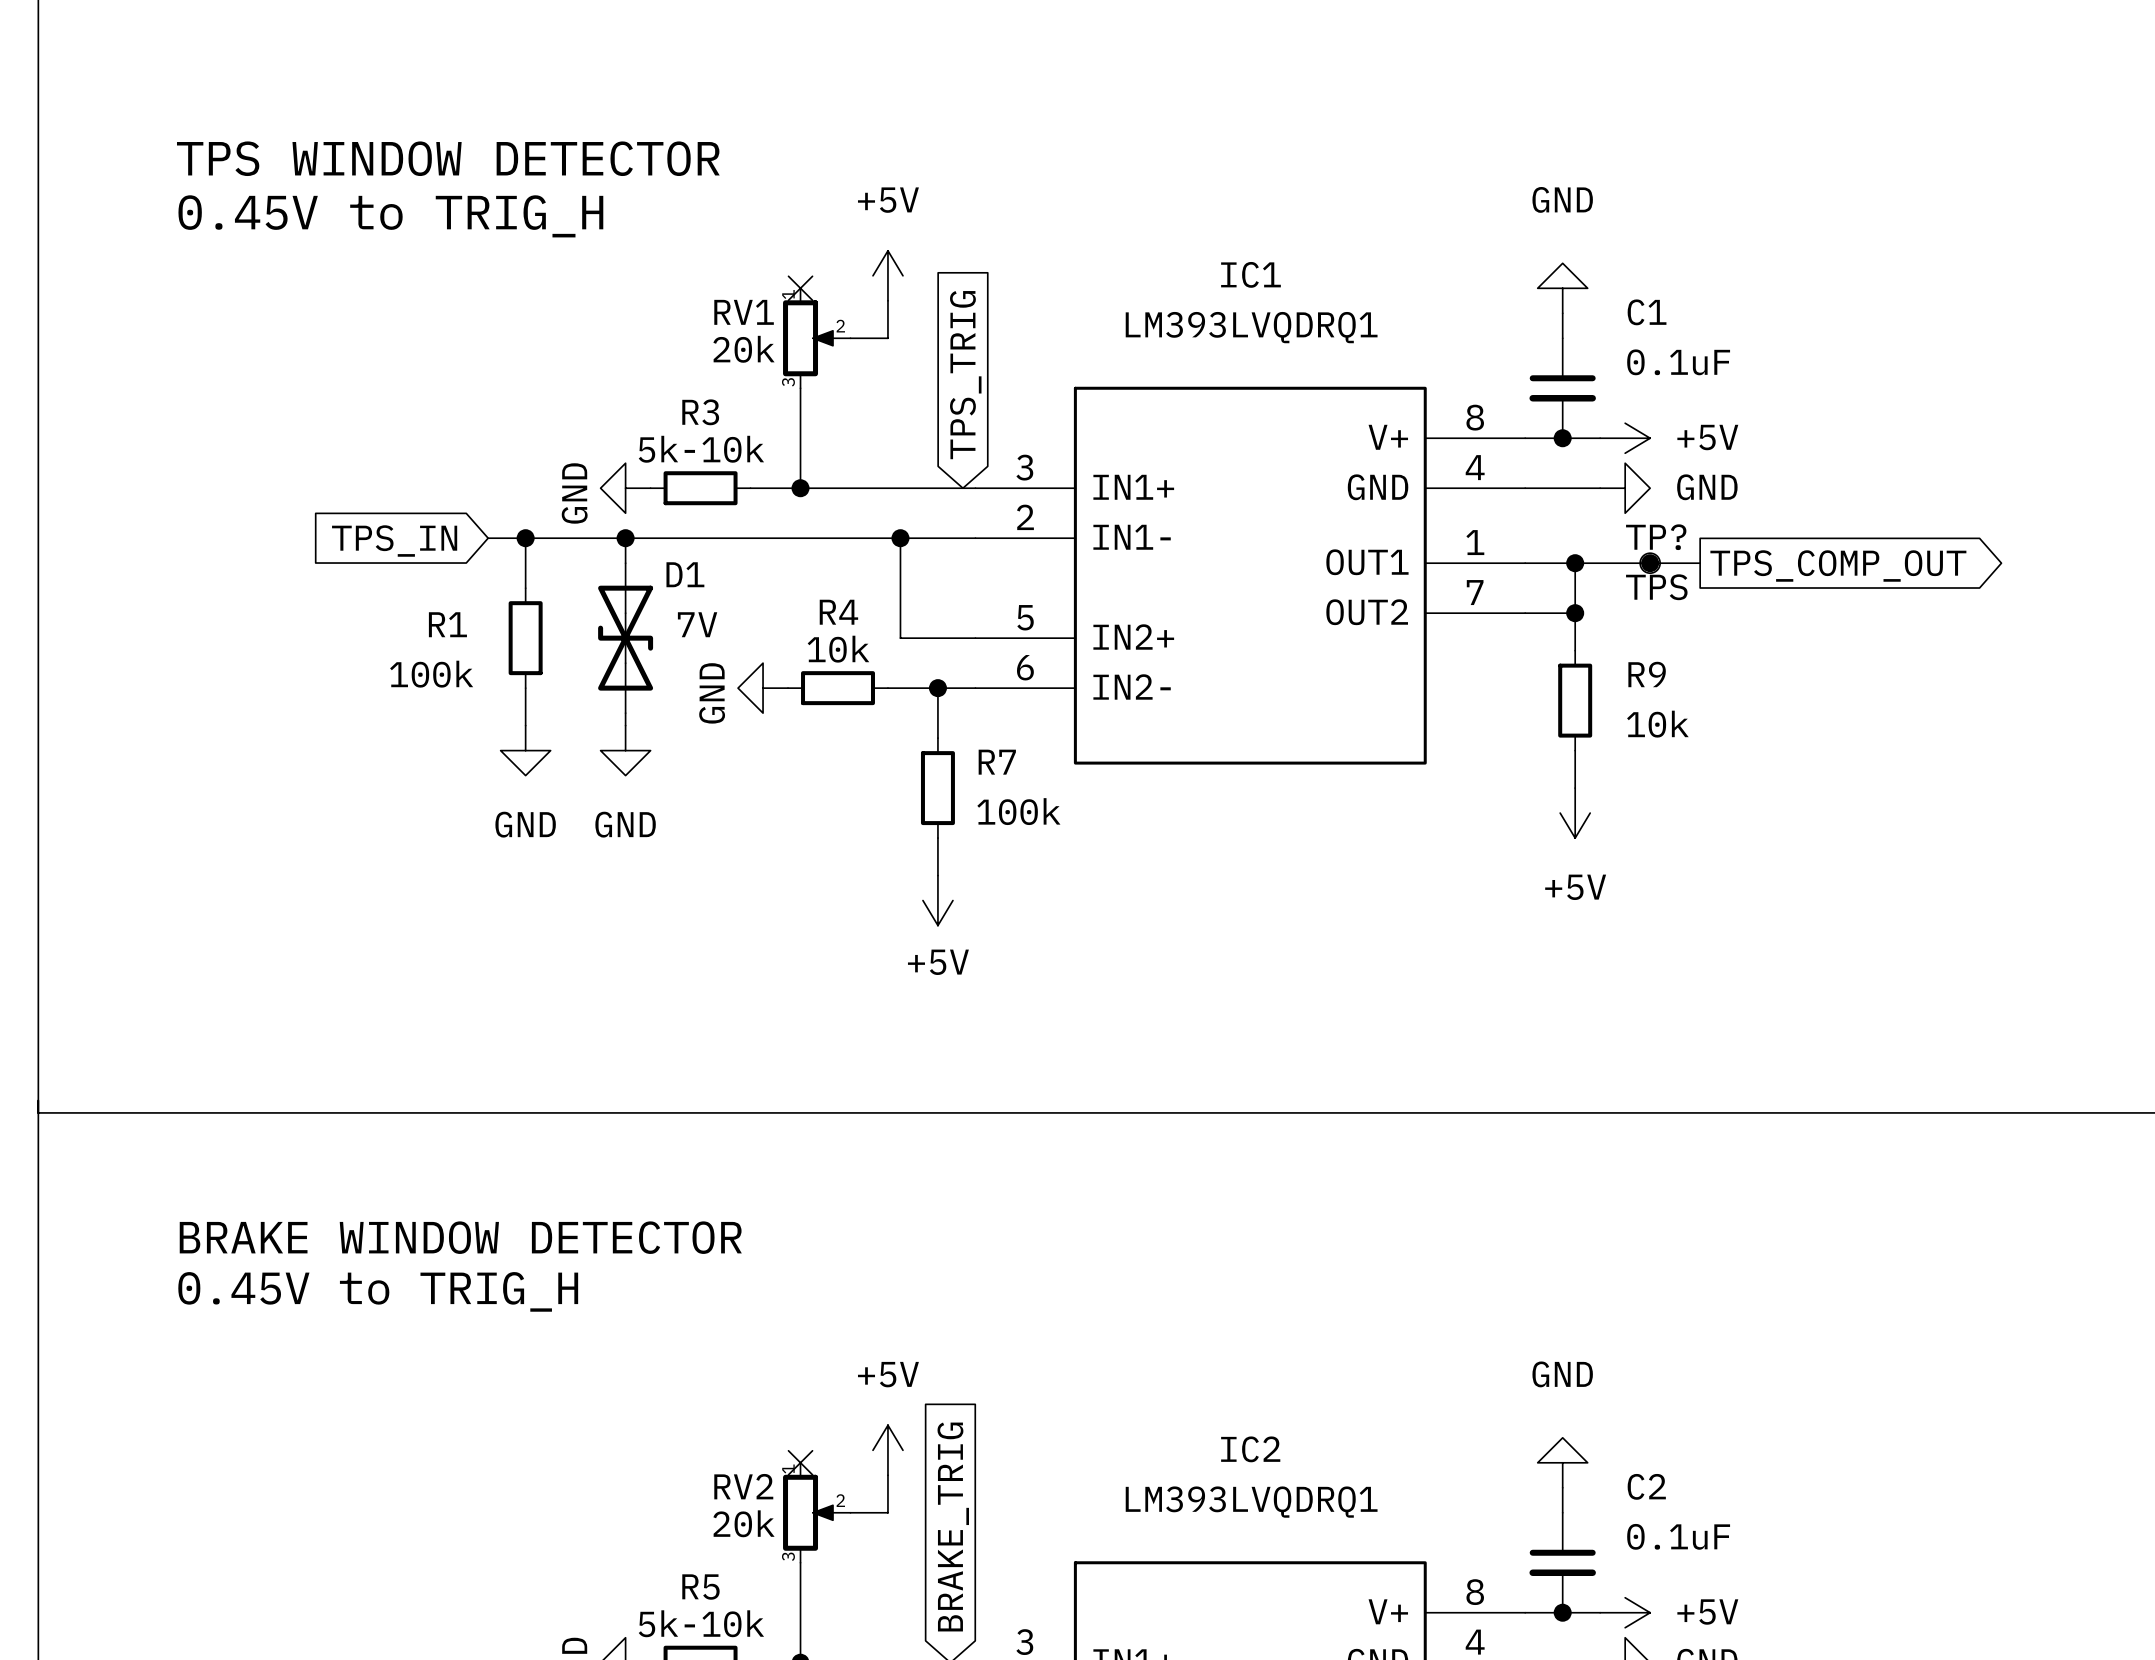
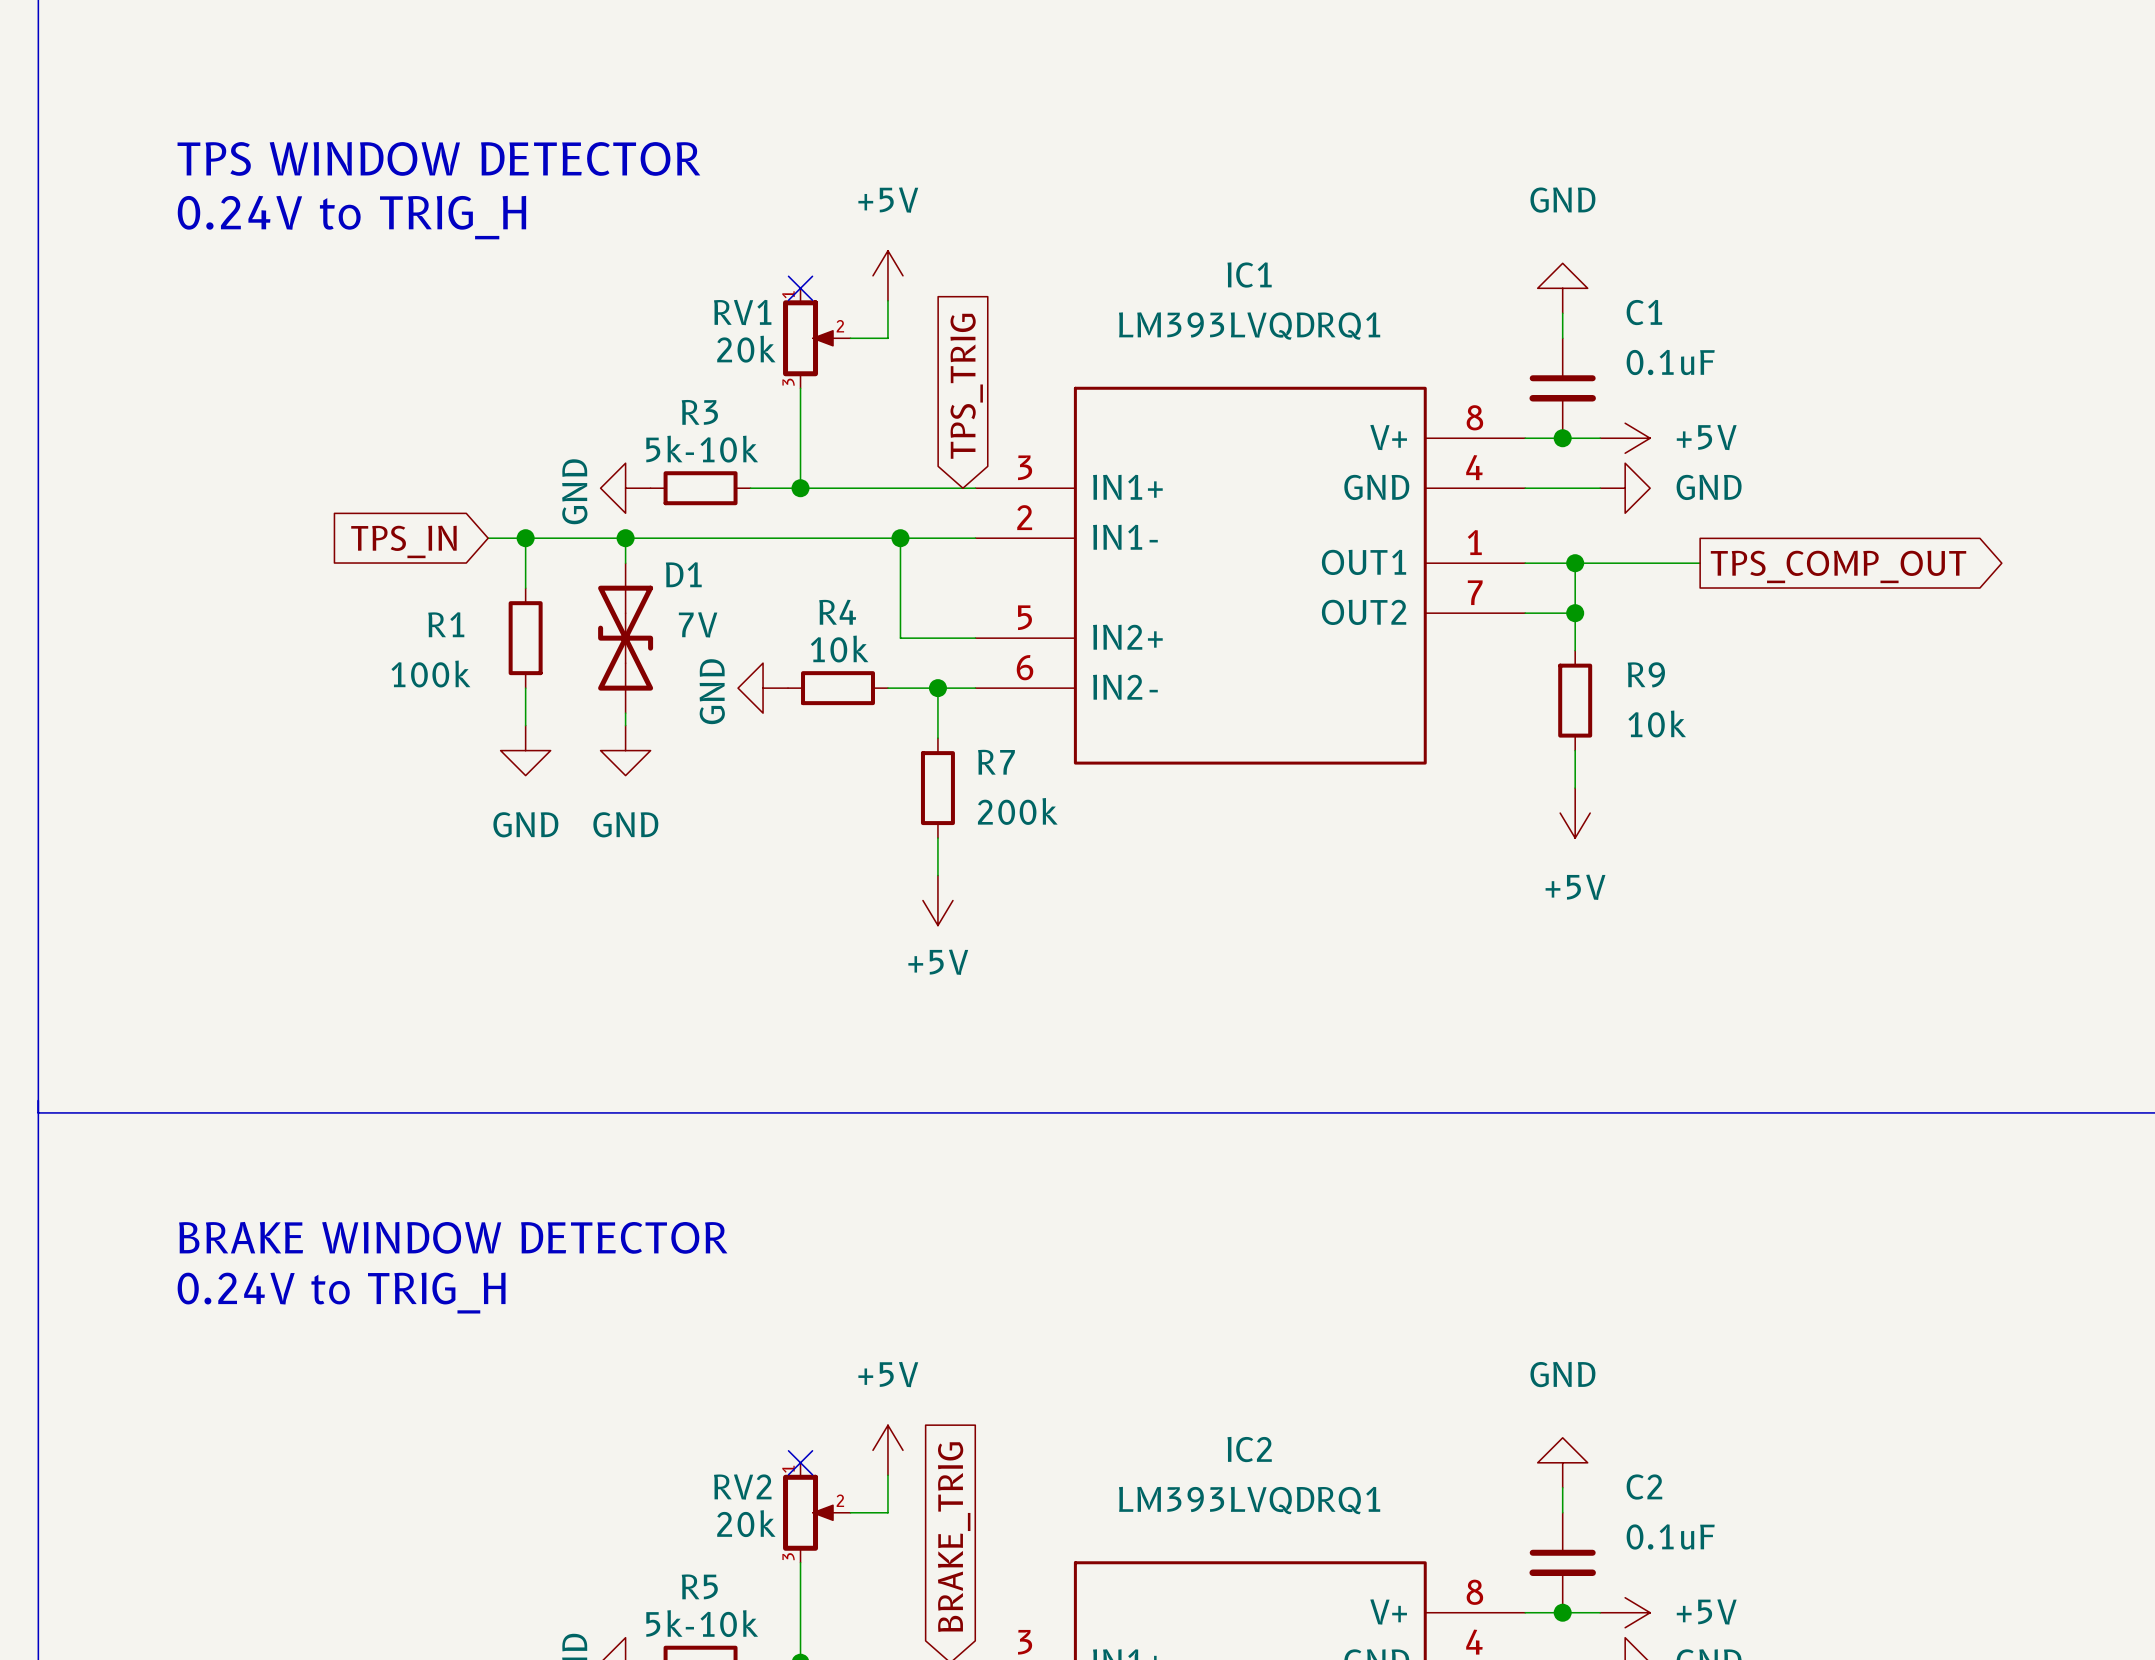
text: 0.45V to TRIG_H (390, 216) -> 0.24V to TRIG_H (351, 217)
junction: (1650, 563) -> none
TP?: TPS (1650, 563) -> none
R7 value: 100k (1018, 811) -> 200k (1017, 811)
text: 0.45V to TRIG_H (378, 1291) -> 0.24V to TRIG_H (341, 1293)

